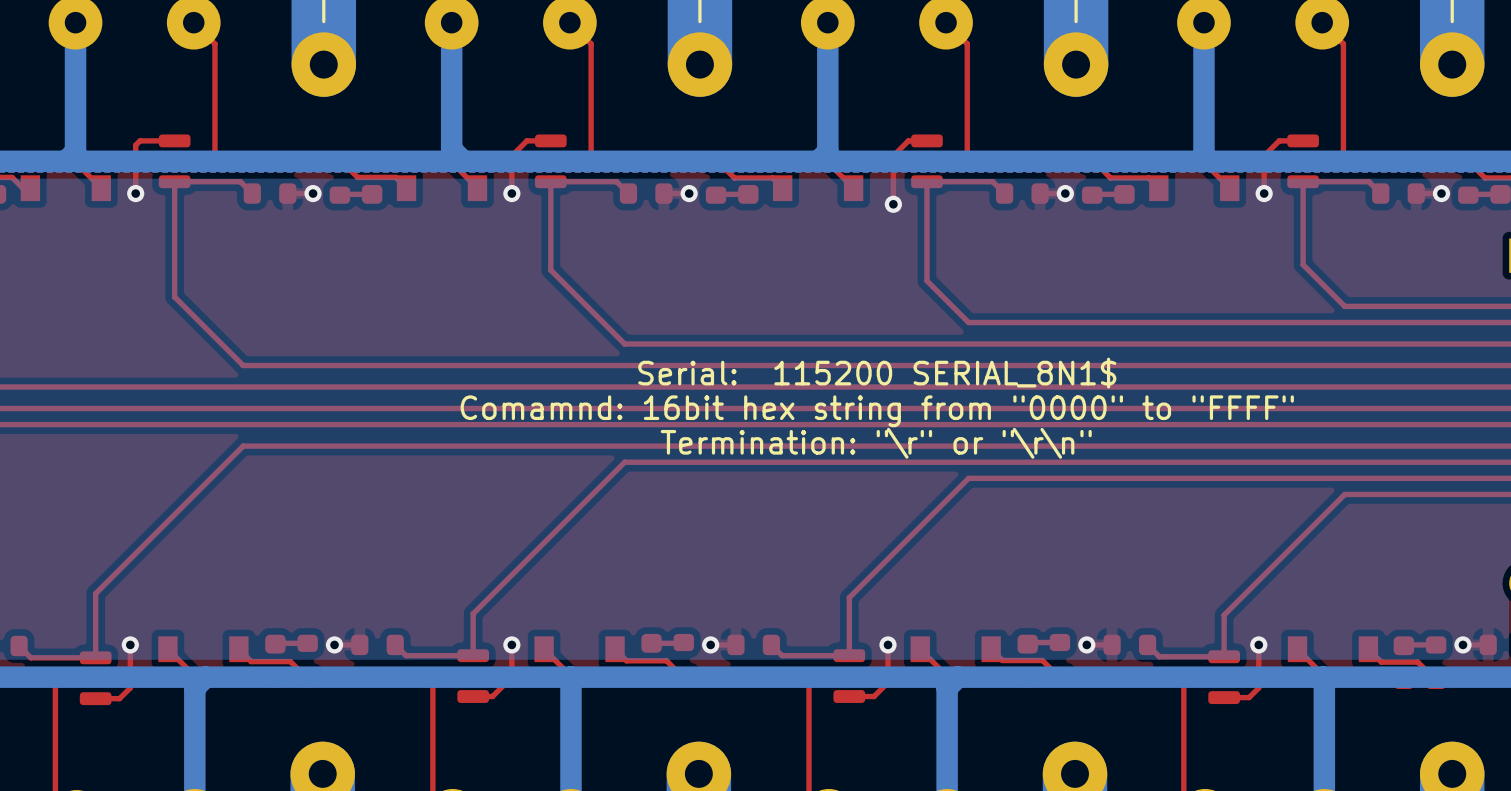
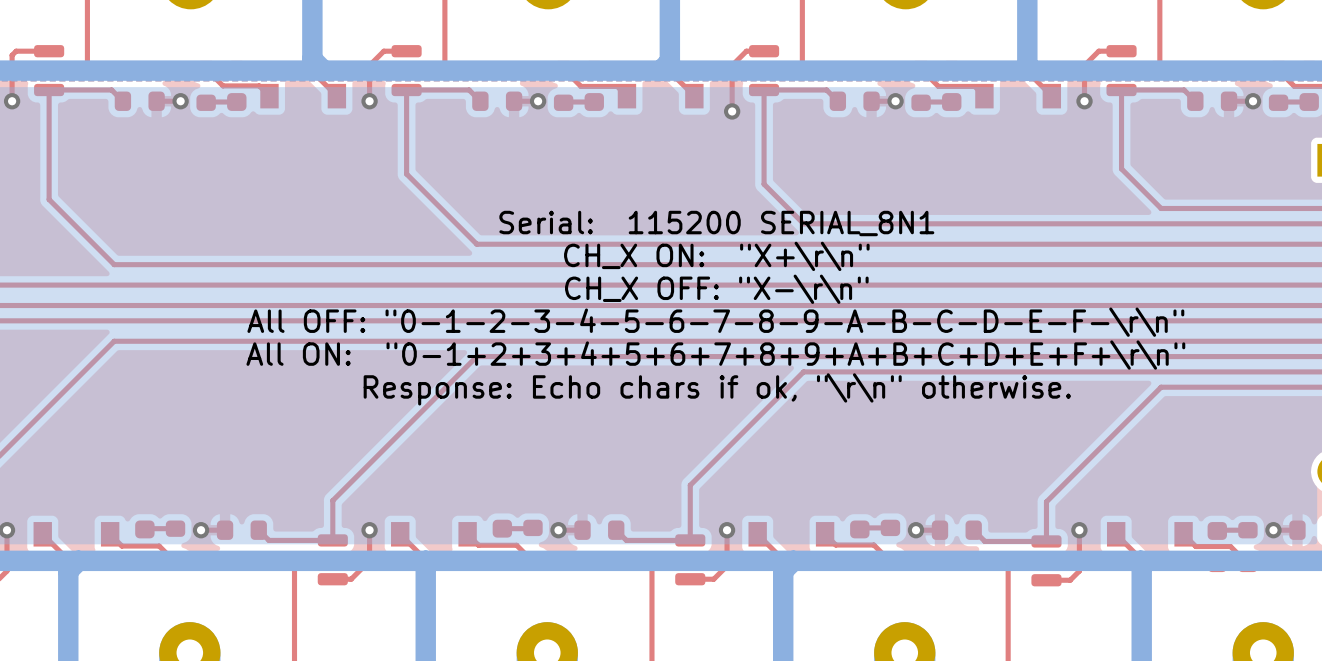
text: none -> Serial: 115200 SERIAL_8N1 (716, 223)
text: none -> CH_X ON: "X+\r\n" (716, 256)
text: Serial: 115200 SERIAL_8N1$ (877, 373) -> none
text: none -> CH_X OFF: "X-\r\n" (716, 289)
text: Comamnd: 16bit hex string from "0000" to "FFFF" (877, 411) -> none
text: none -> All OFF: "0-1-2-3-4-5-6-7-8-9-A-B-C-D-E-F-\r\n" (715, 322)
text: Termination: "\r" or "\r\n" (876, 443) -> none
text: none -> All ON: "0-1+2+3+4+5+6+7+8+9+A+B+C+D+E+F+\r\n" (715, 355)
text: none -> Response: Echo chars if ok, "\r\n" otherwise. (717, 389)

